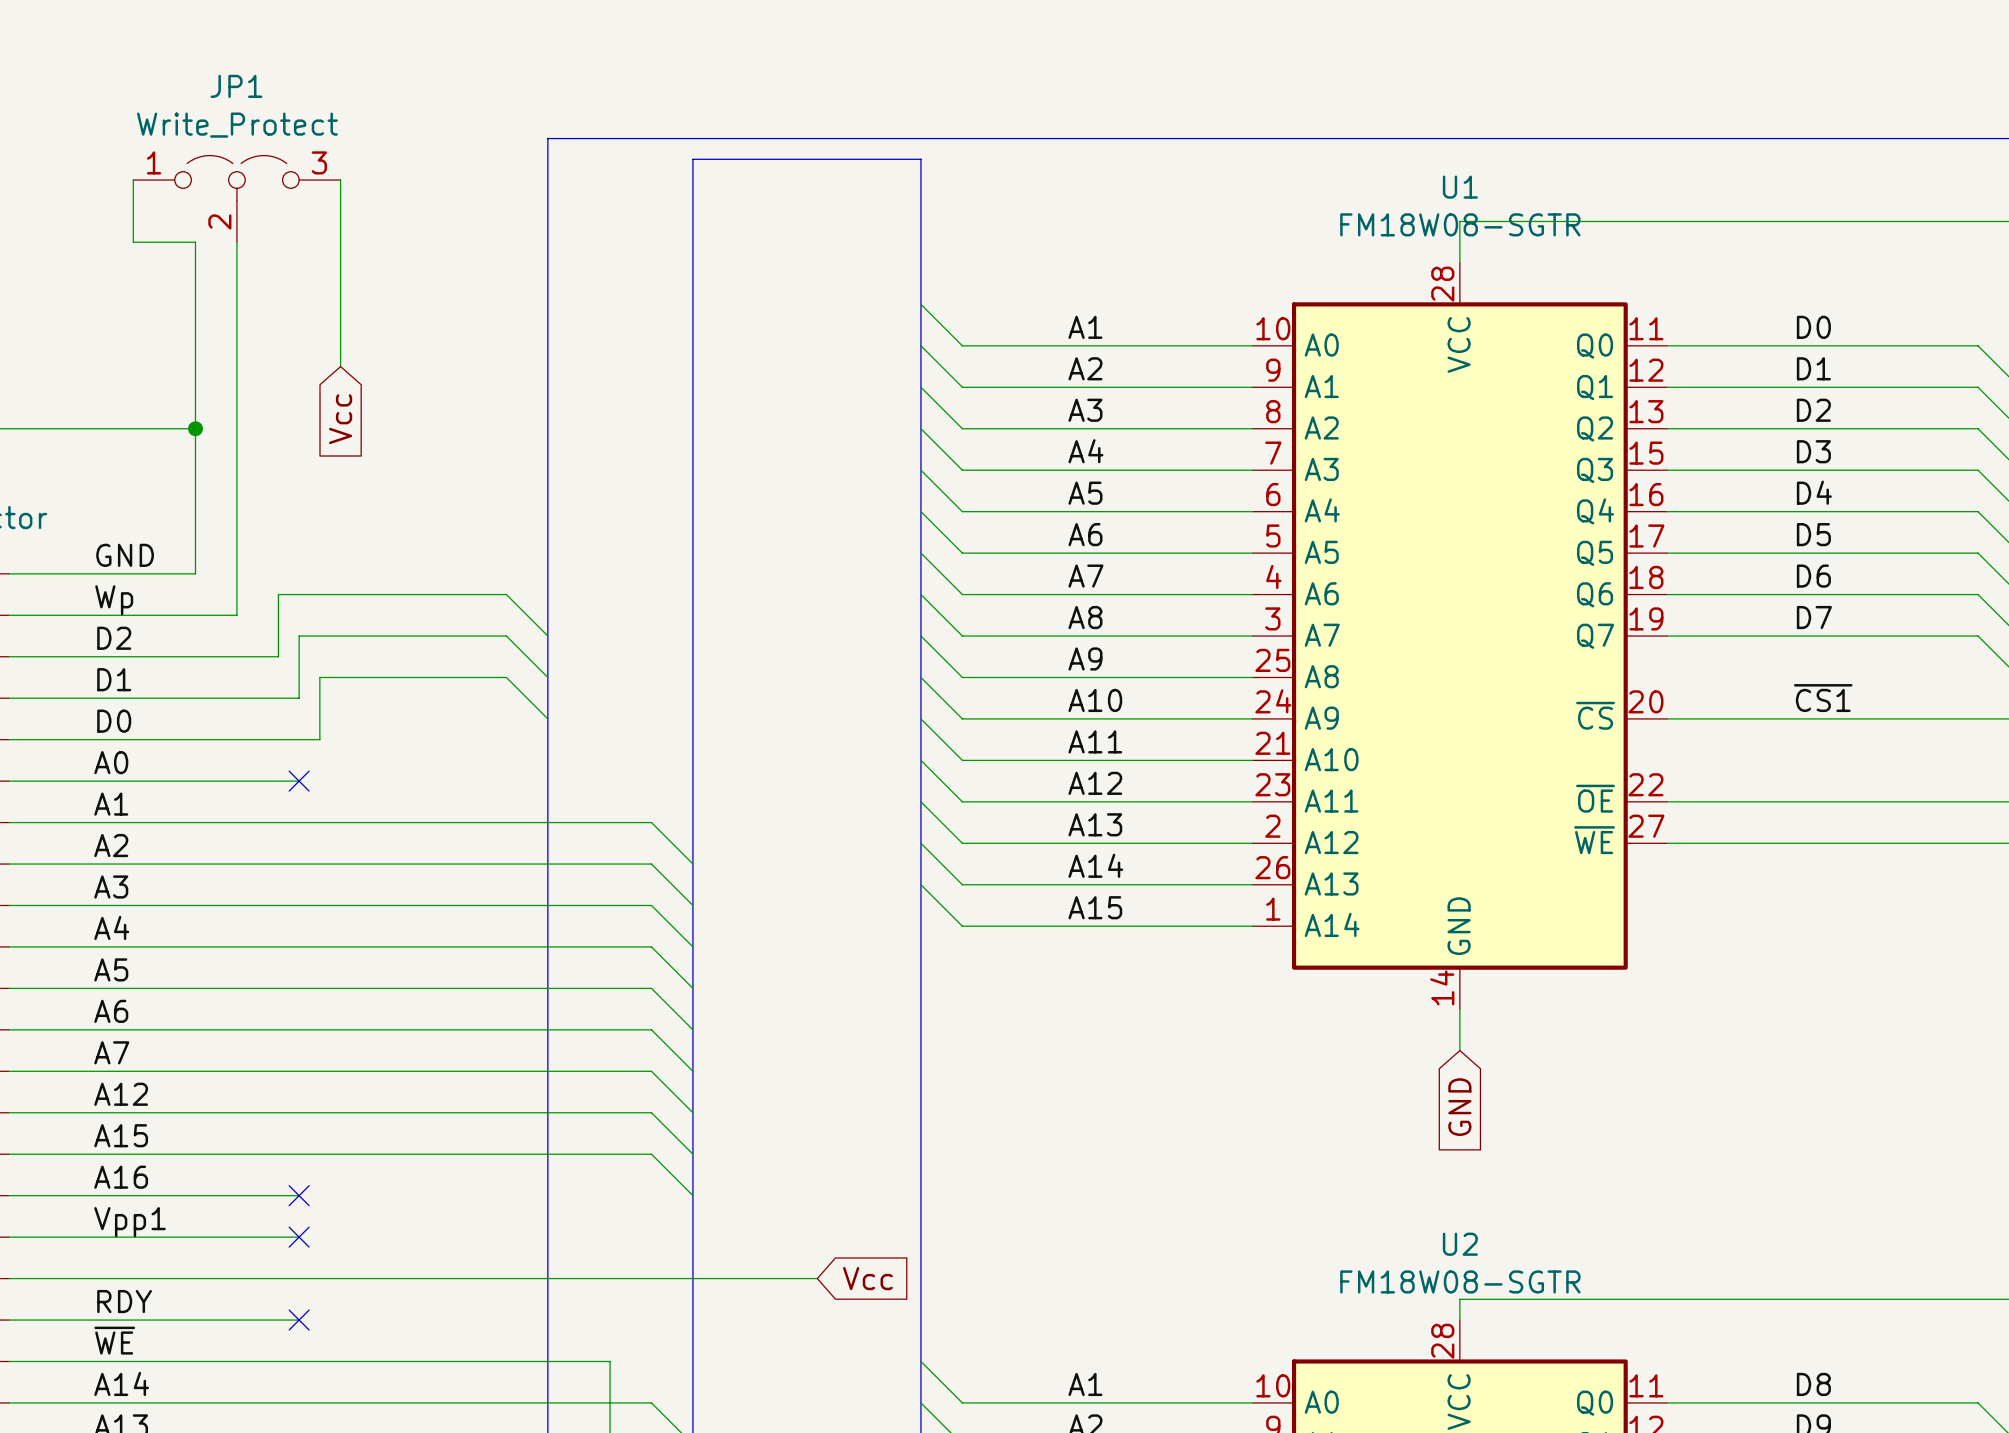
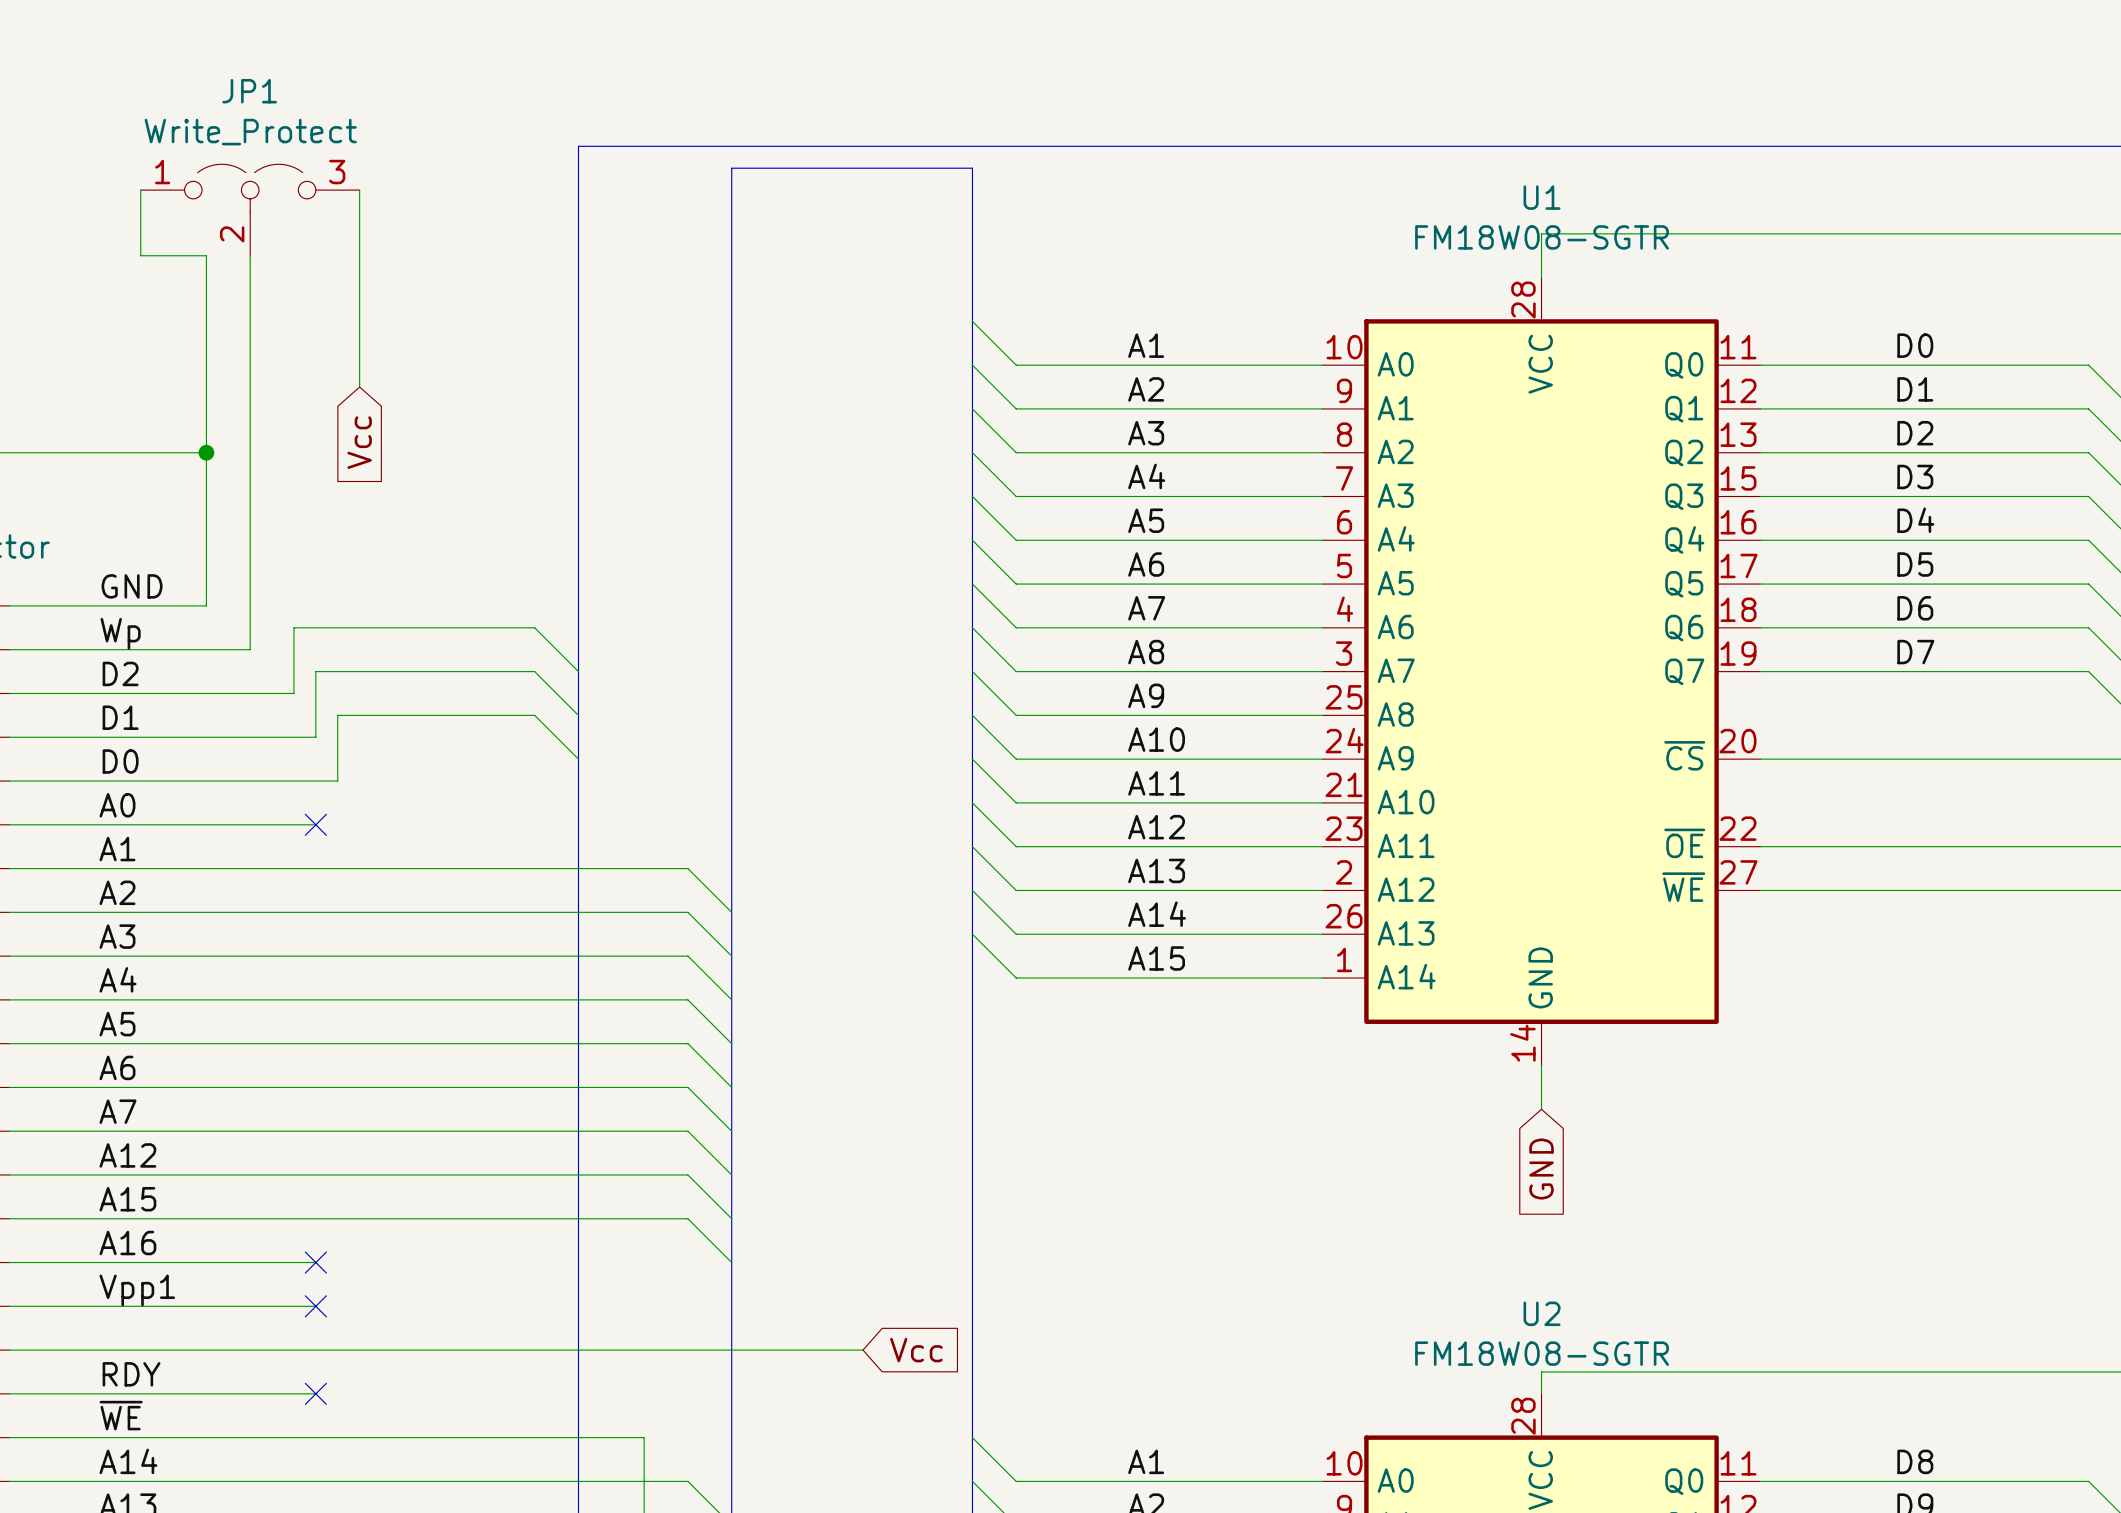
label: ~{CS1} (1823, 698) -> none

